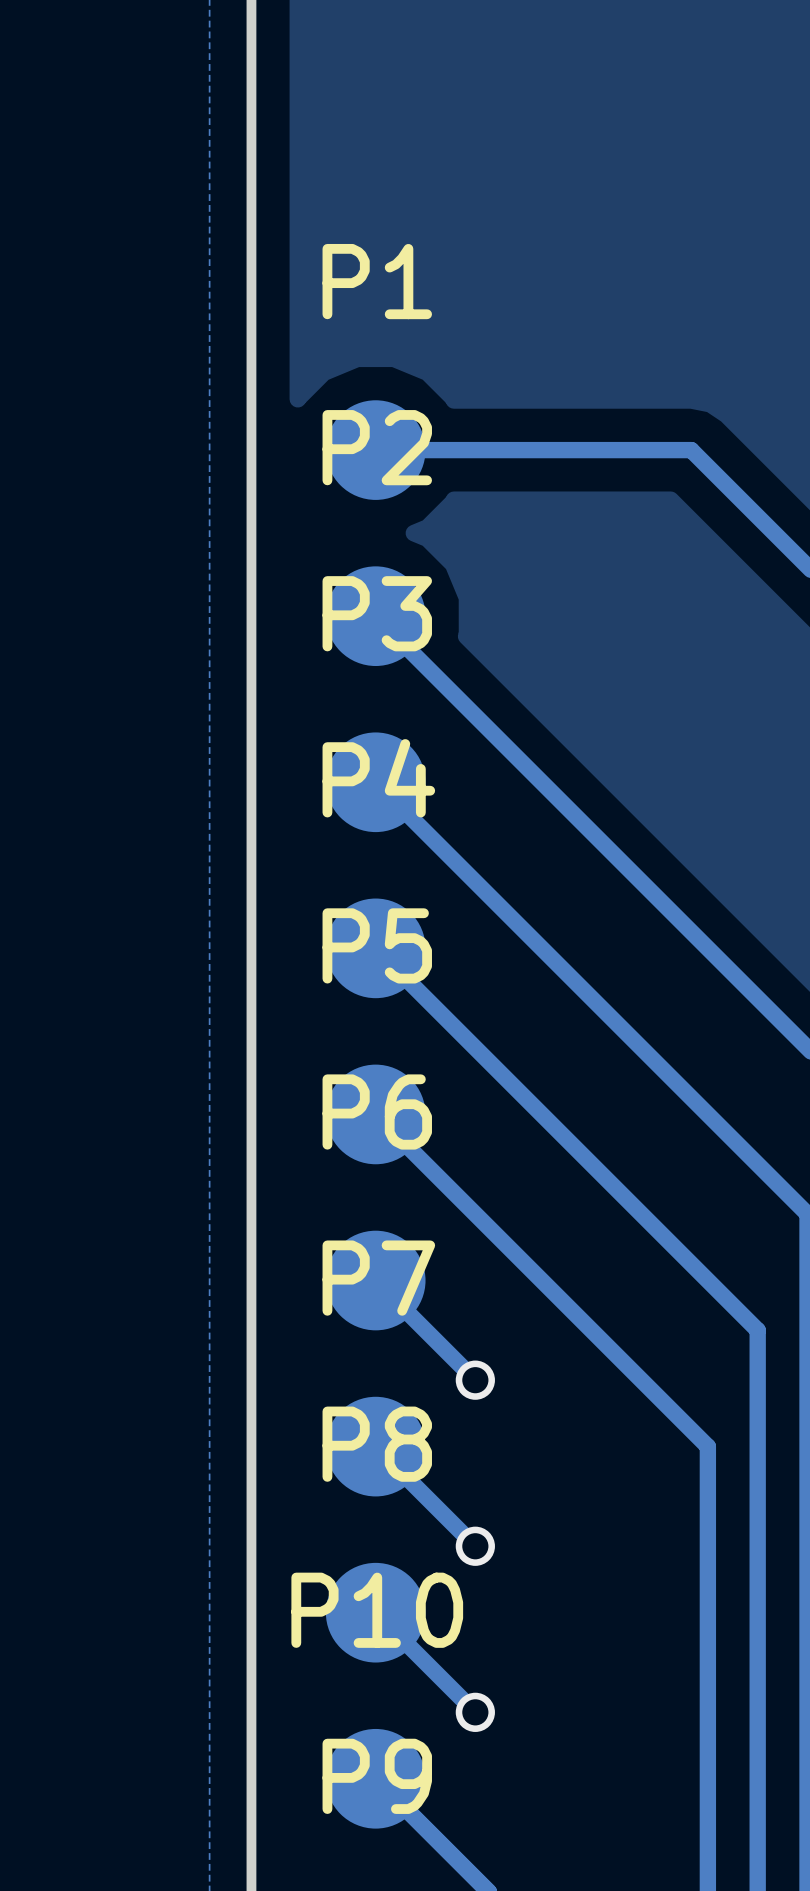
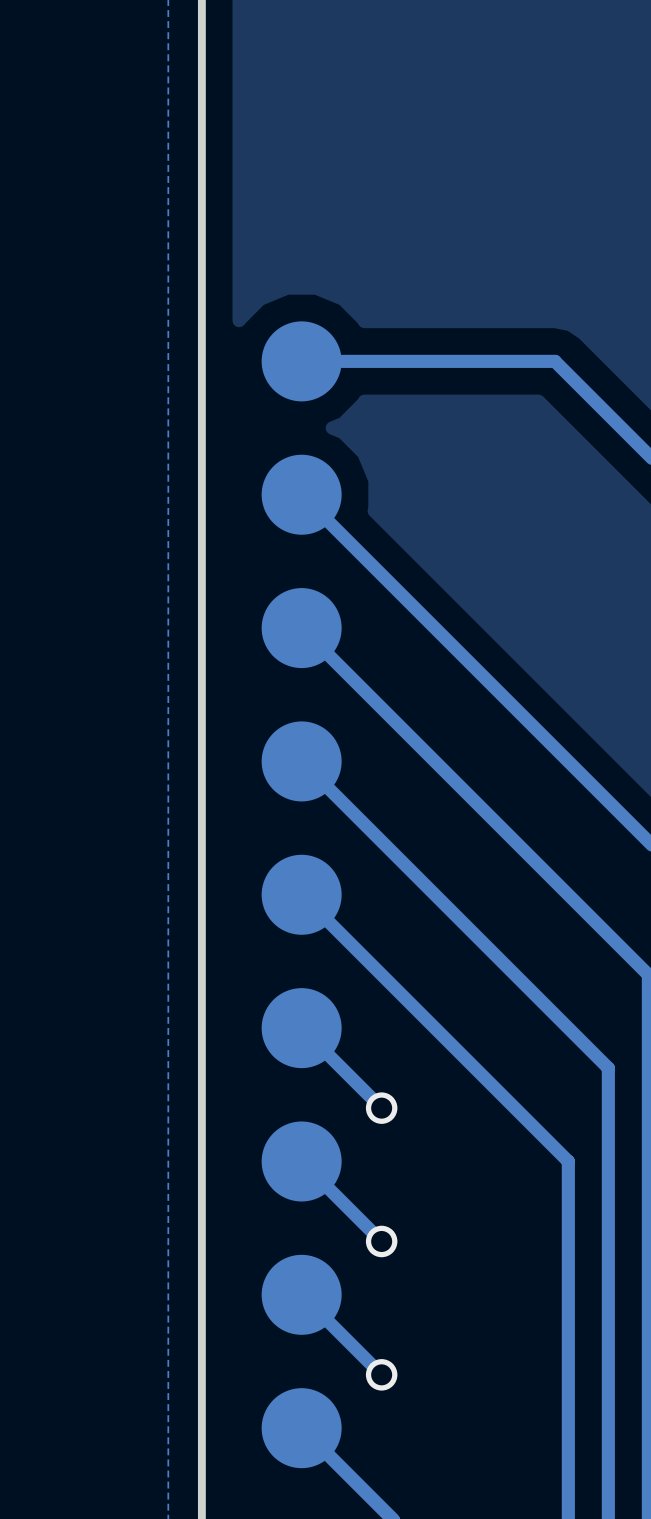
P1 name: P1 (377, 281) -> none
P2 name: P2 (377, 447) -> none
P3 name: P3 (377, 613) -> none
P4 name: P4 (378, 778) -> none
P5 name: P5 (377, 945) -> none
P6 name: P6 (377, 1111) -> none
P7 name: P7 (378, 1278) -> none
P8 name: P8 (377, 1444) -> none
P10 name: P10 (377, 1610) -> none
P9 name: P9 (377, 1776) -> none

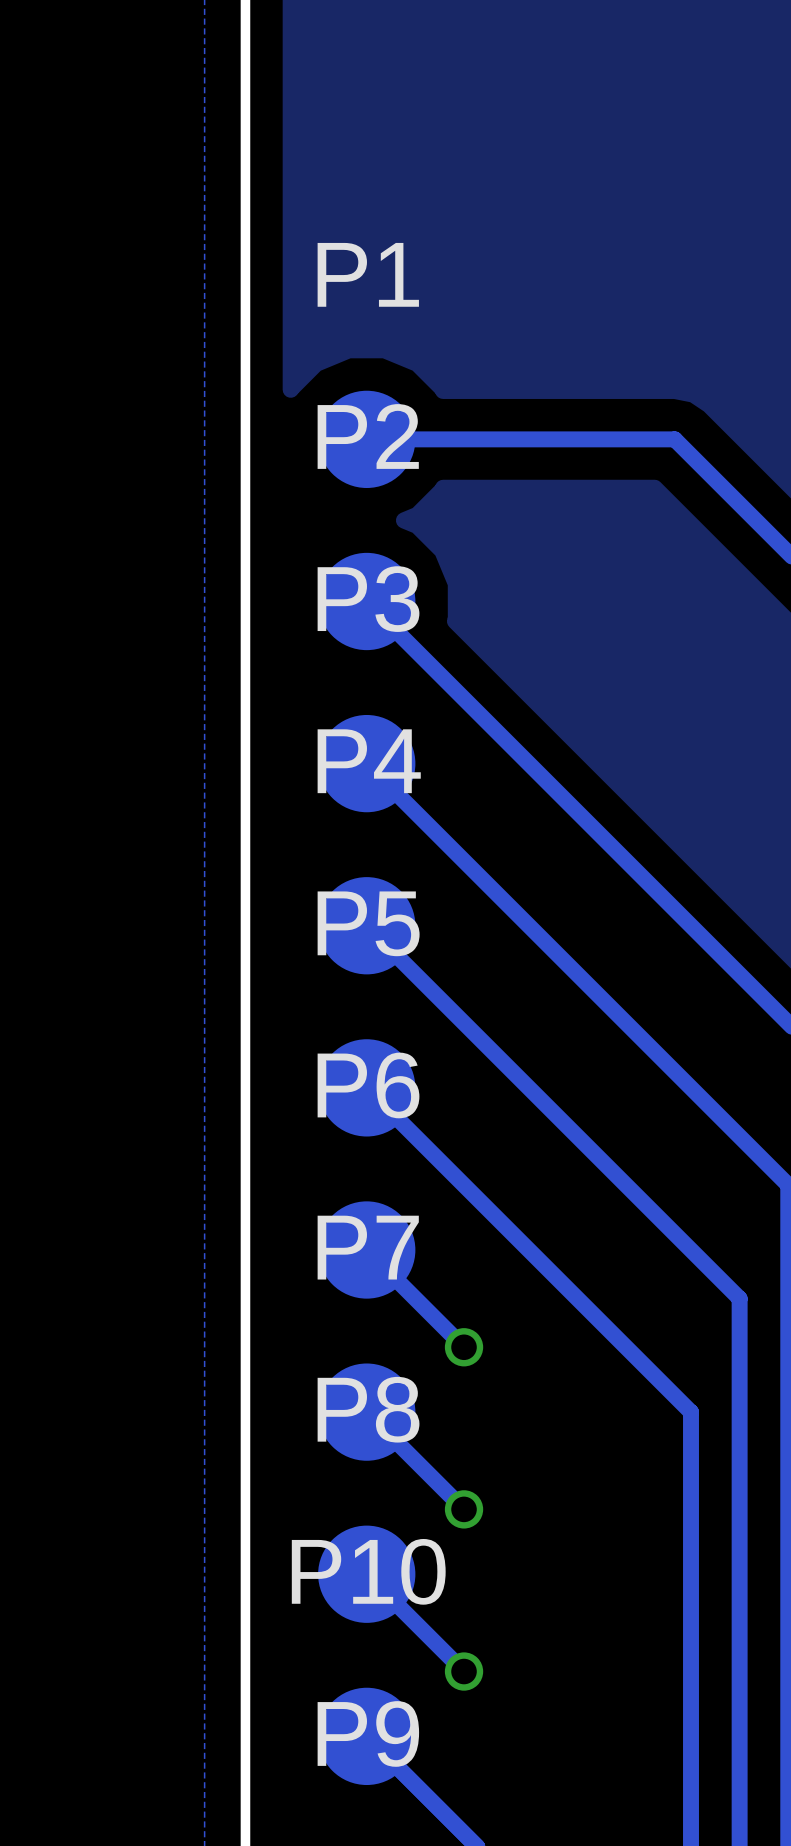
P1 name: none -> P1 (368, 274)
P2 name: none -> P2 (368, 436)
P3 name: none -> P3 (368, 599)
P4 name: none -> P4 (369, 761)
P5 name: none -> P5 (368, 923)
P6 name: none -> P6 (368, 1085)
P7 name: none -> P7 (368, 1247)
P8 name: none -> P8 (368, 1409)
P10 name: none -> P10 (368, 1571)
P9 name: none -> P9 (368, 1733)

